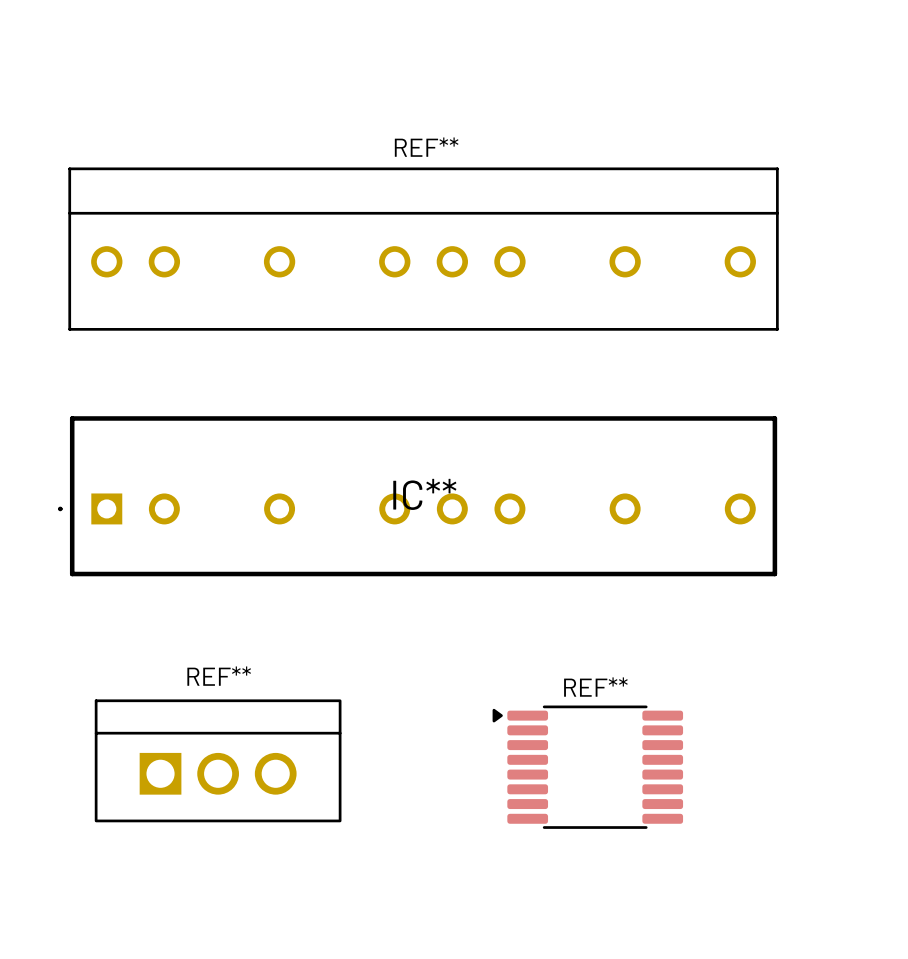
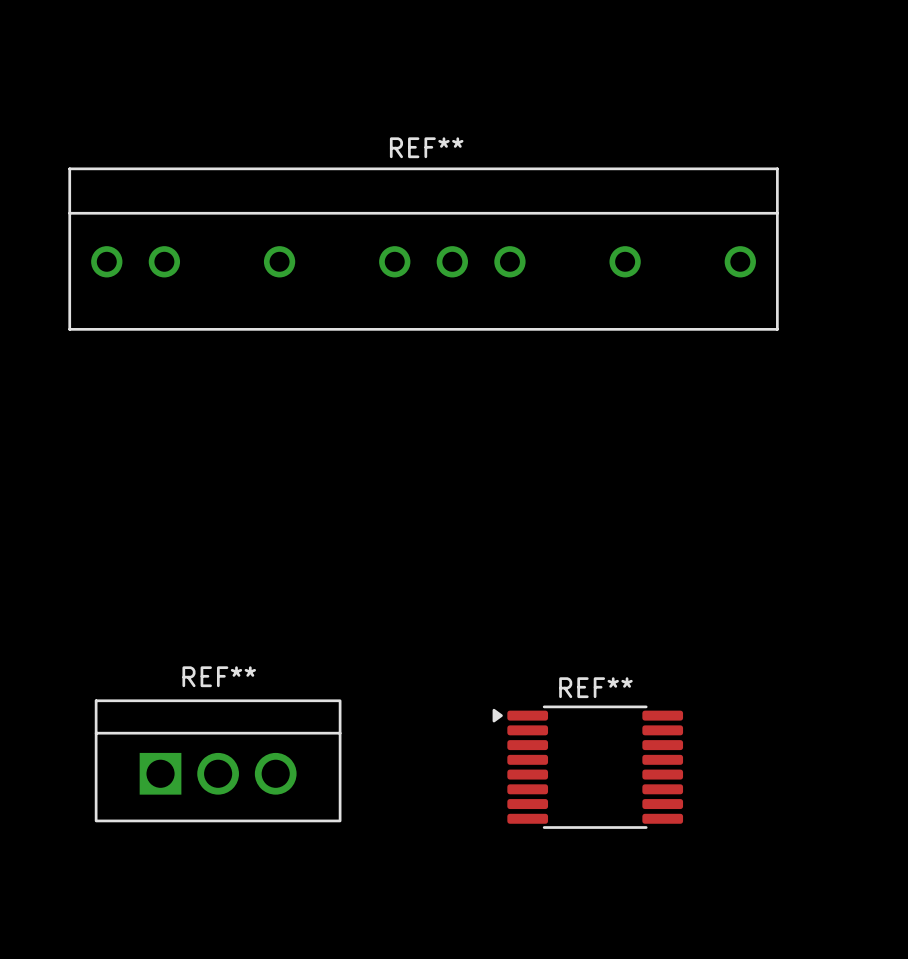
IC**: (417, 496) -> none

